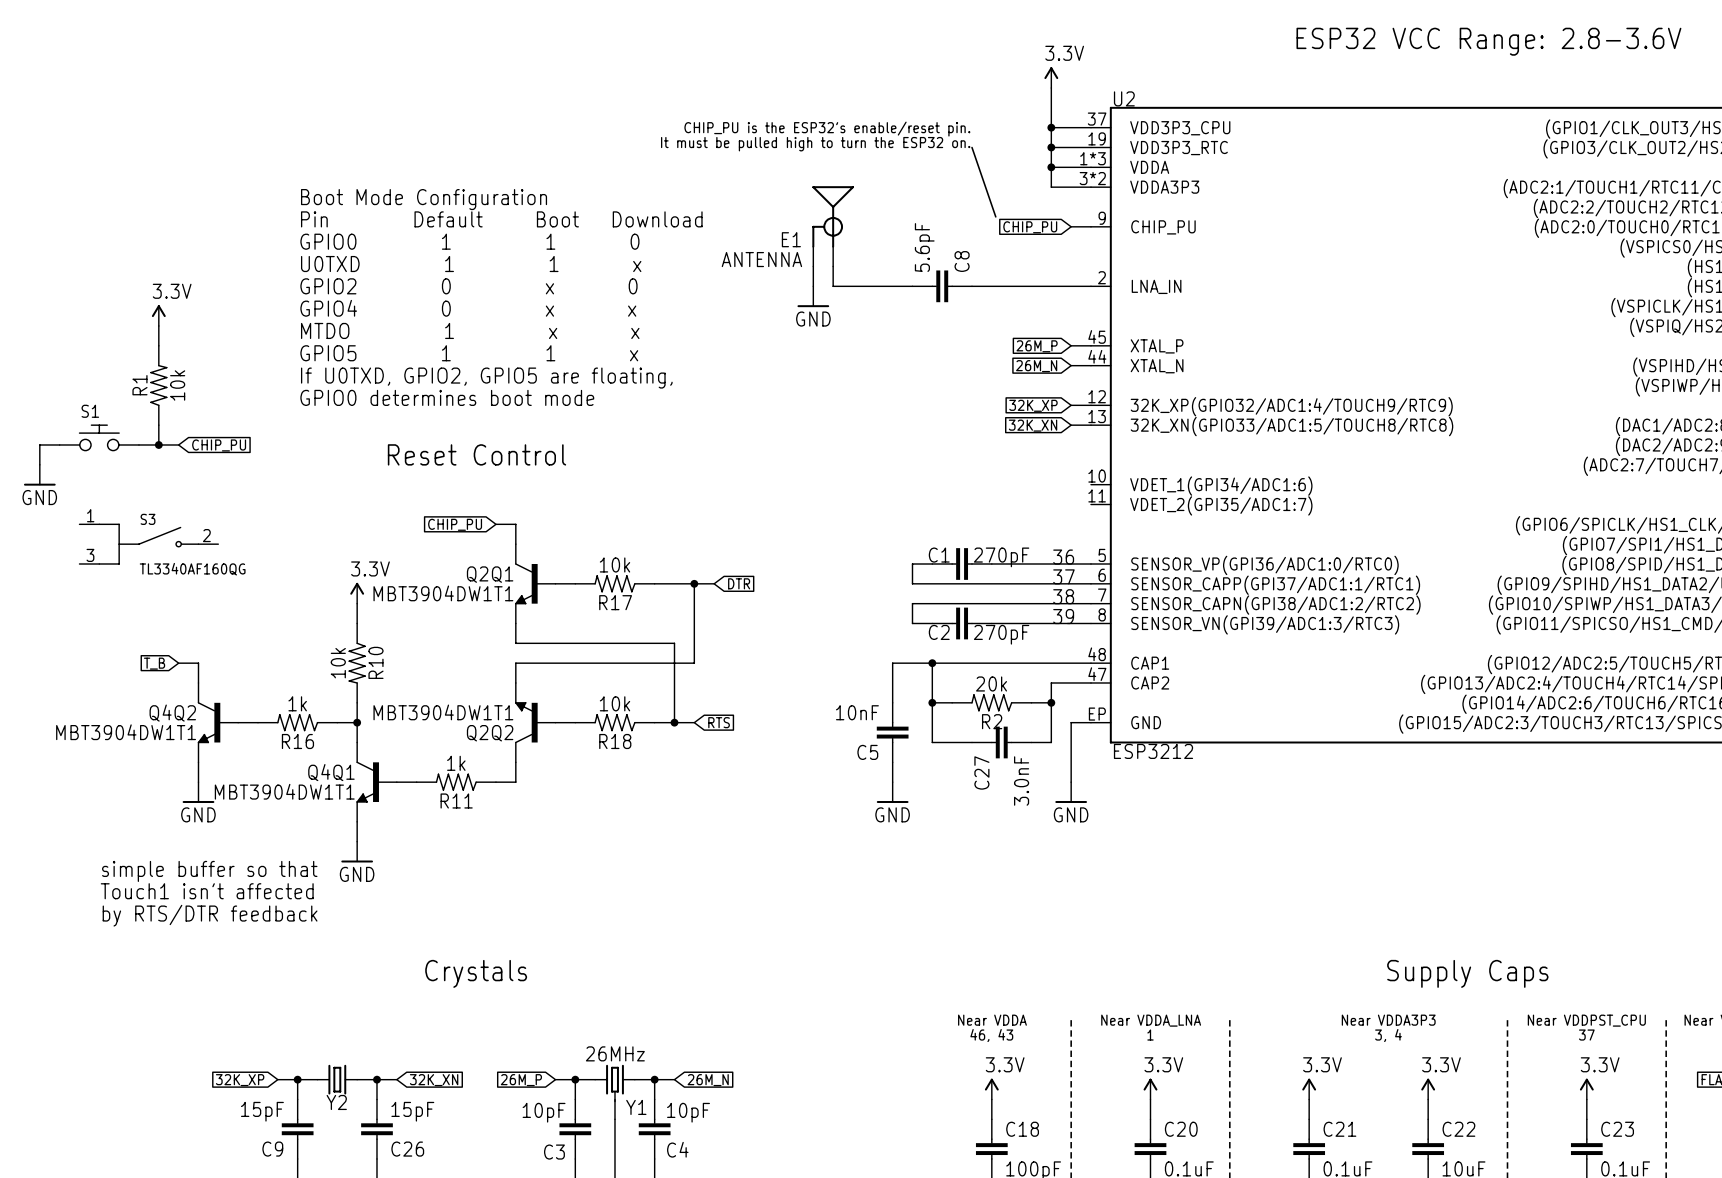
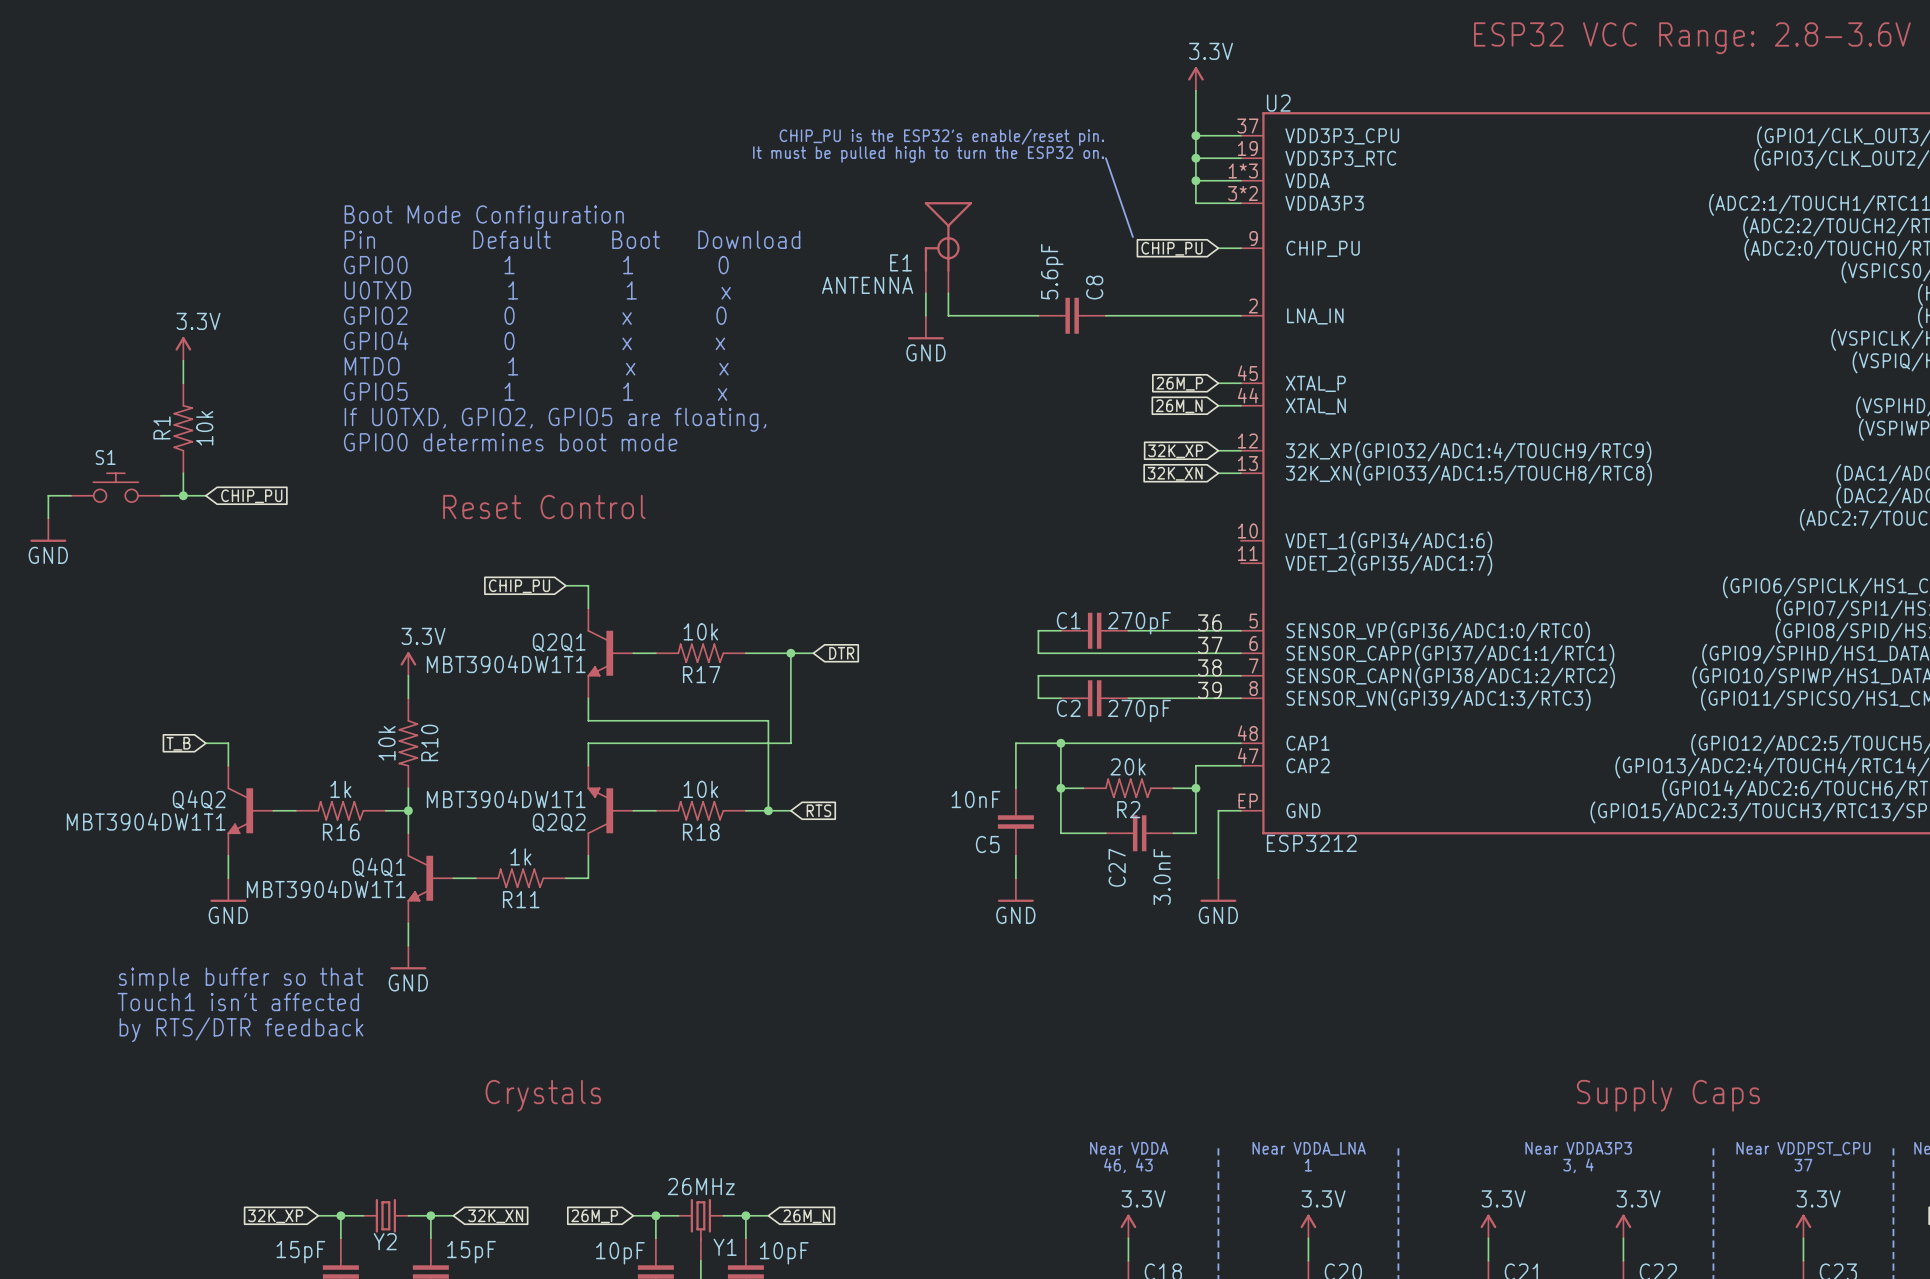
S3: TL3340AF160QG (148, 544) -> none

